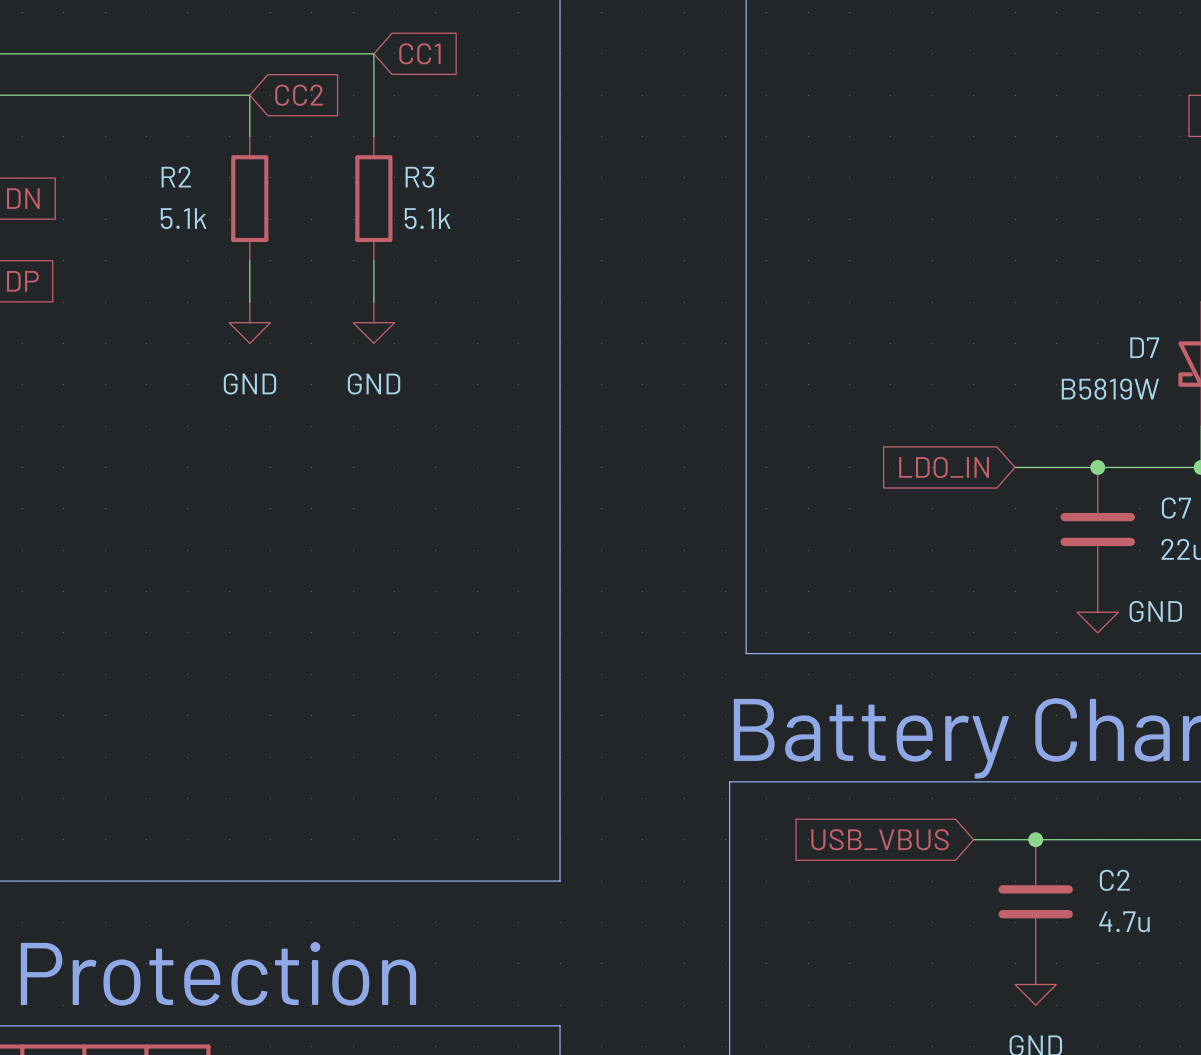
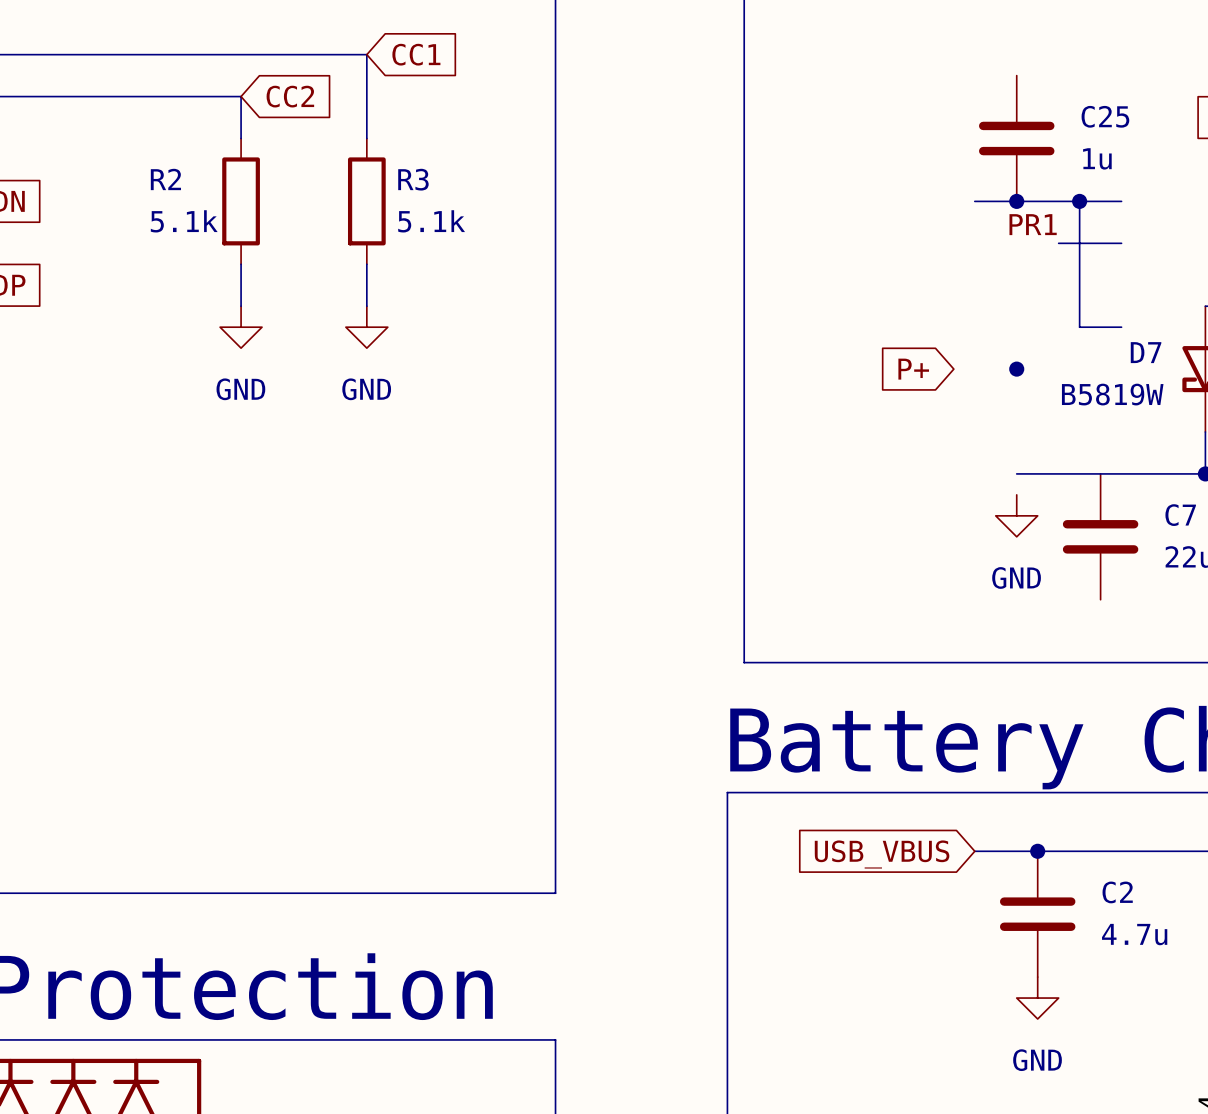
C25: none -> 1u (1016, 138)
wire: none -> (974, 201) (1121, 201)
junction: none -> (1016, 201)
wire: none -> (1079, 201) (1079, 327) (1121, 327)
junction: none -> (1079, 201)
label: none -> PR1 (1033, 224)
wire: none -> (1058, 243) (1121, 243)
global label: none -> P+ (913, 369)
junction: none -> (1016, 369)
global label: LDO_IN (944, 467) -> none
junction: (1097, 467) -> none
power symbol: none -> GND (1016, 515)
power symbol: GND (1097, 612) -> none

